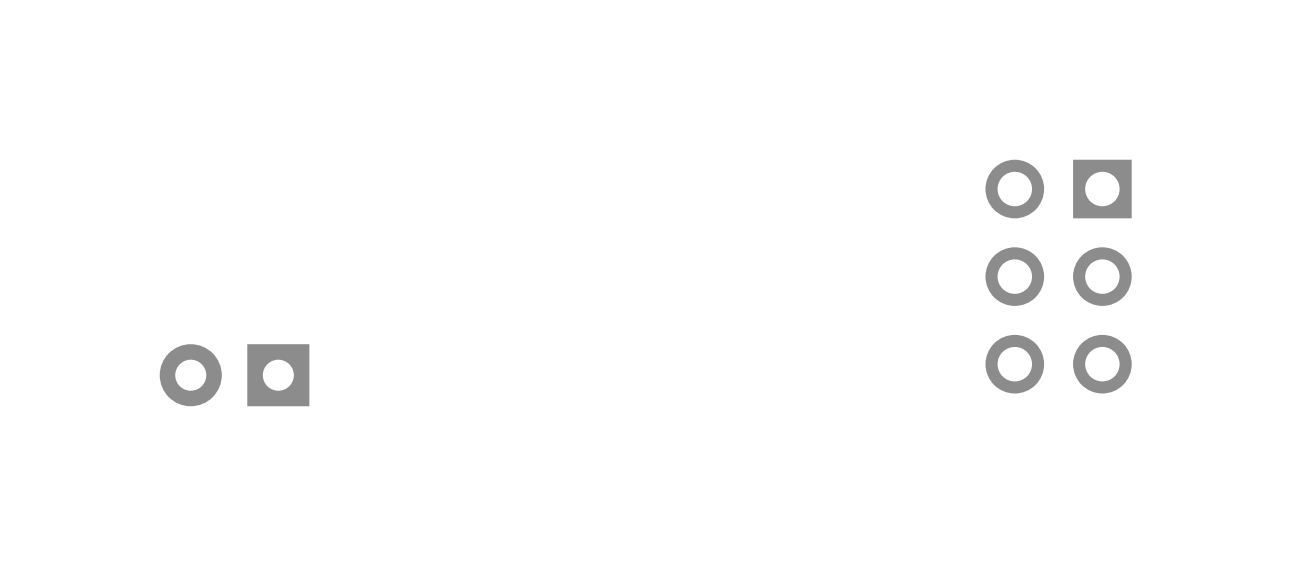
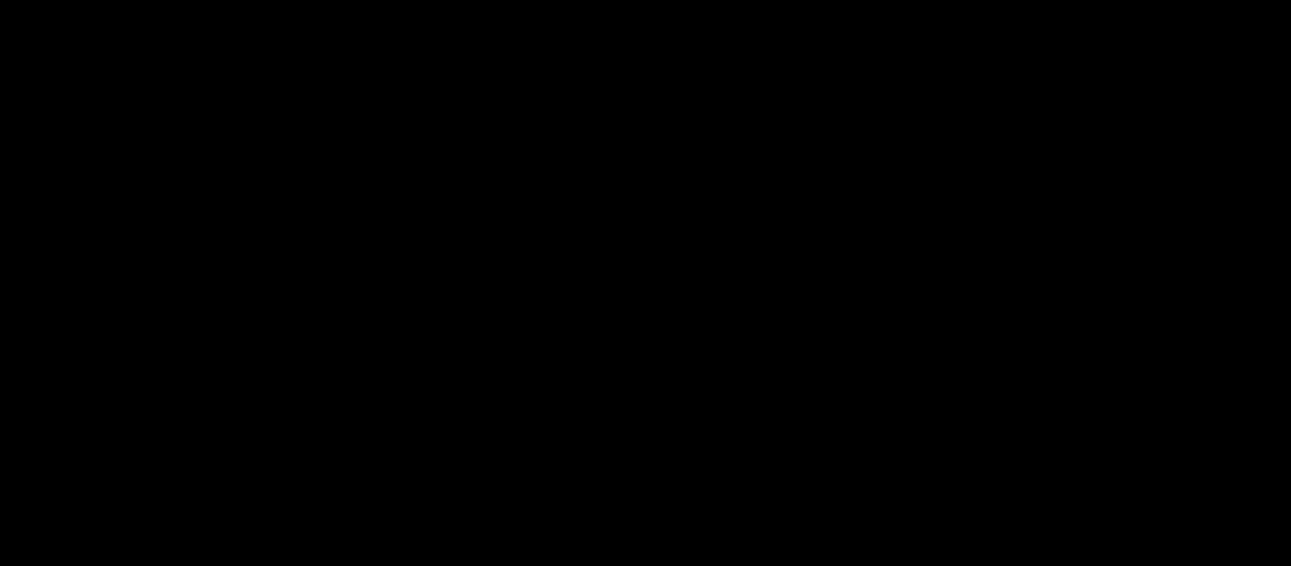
part: (1058, 276) -> none
part: (234, 375) -> none

